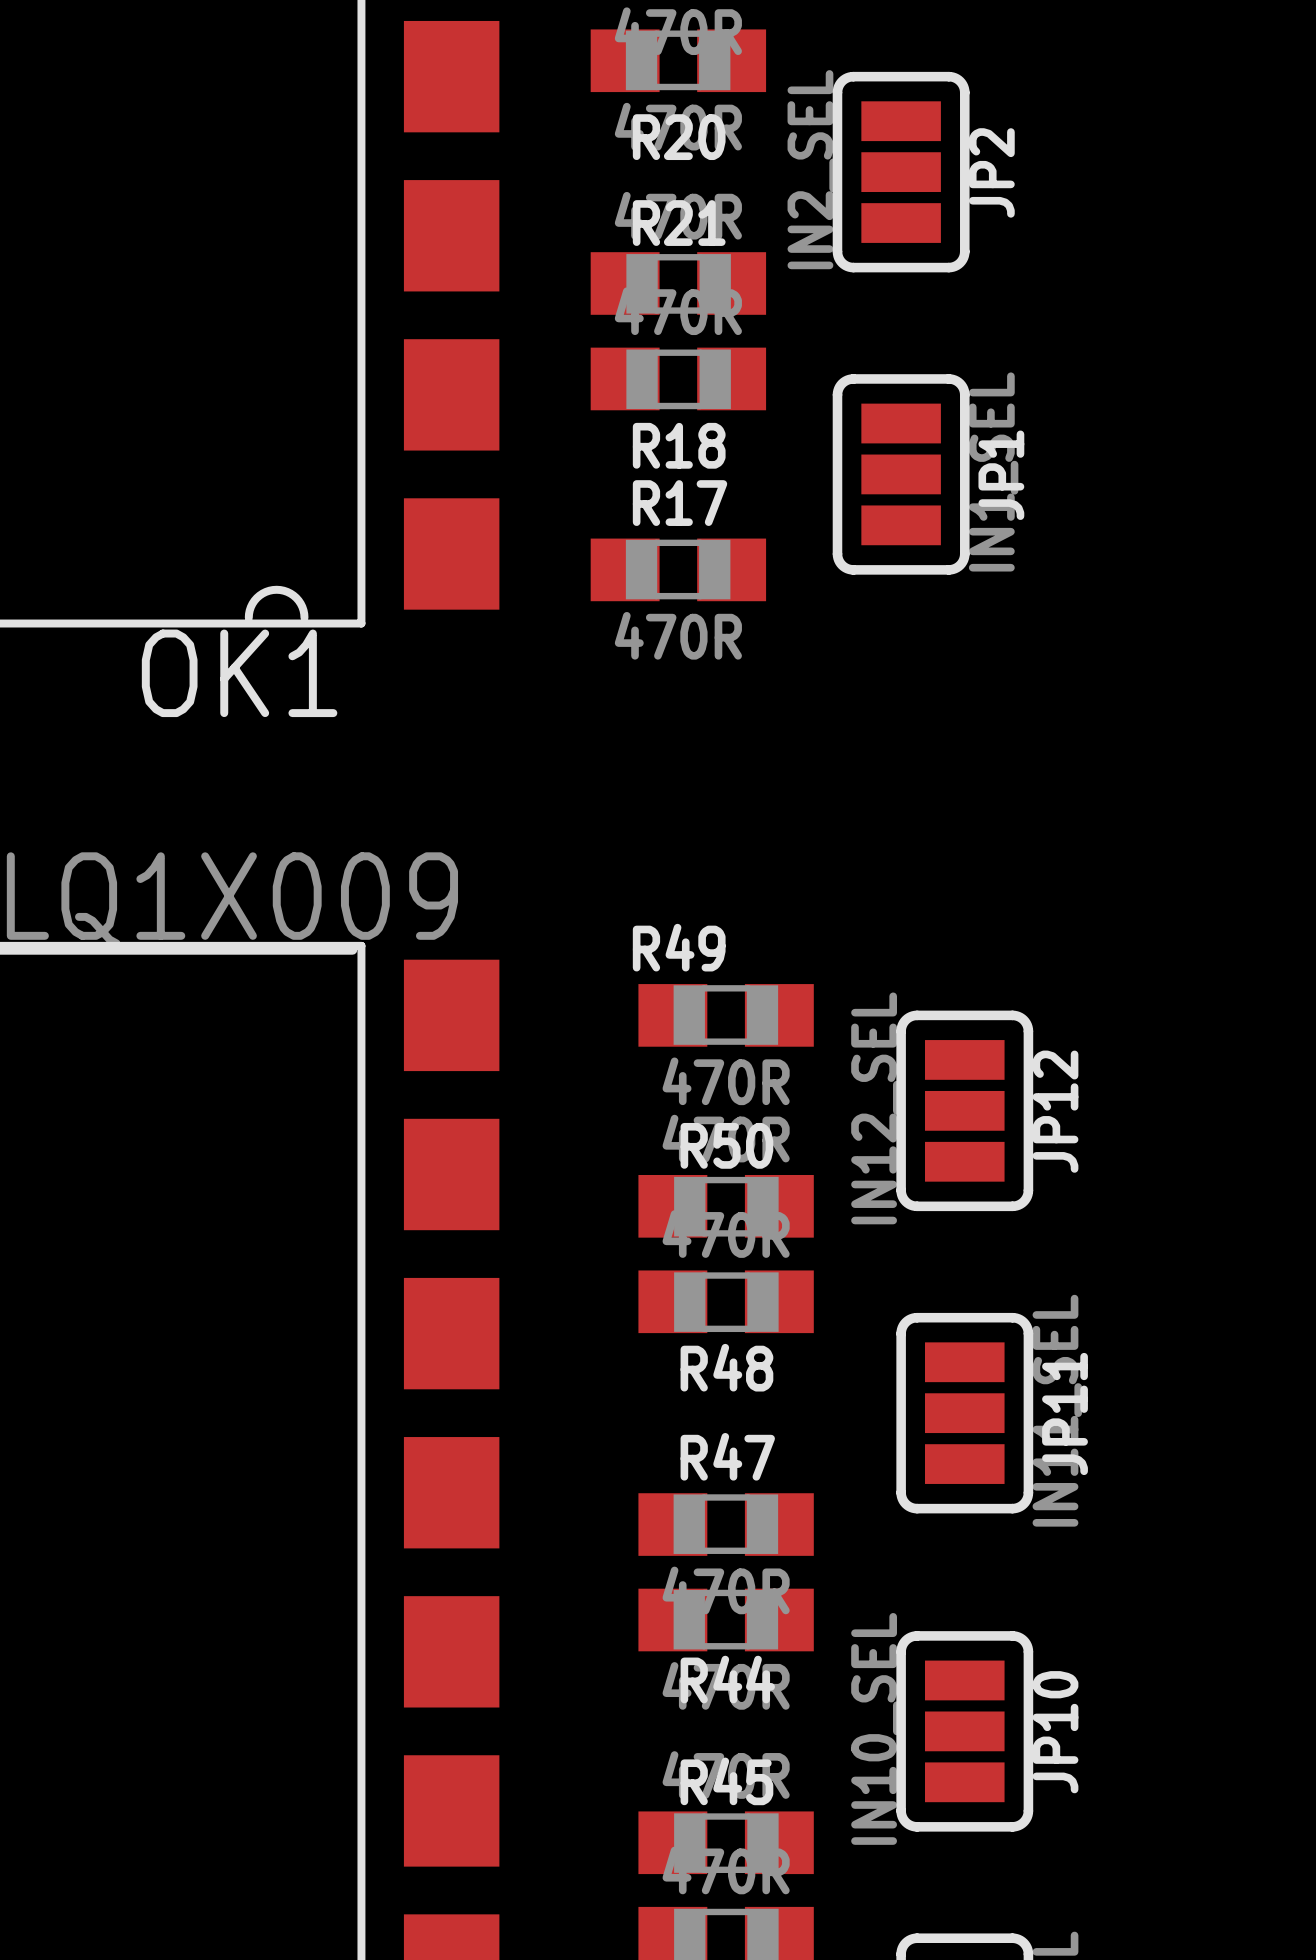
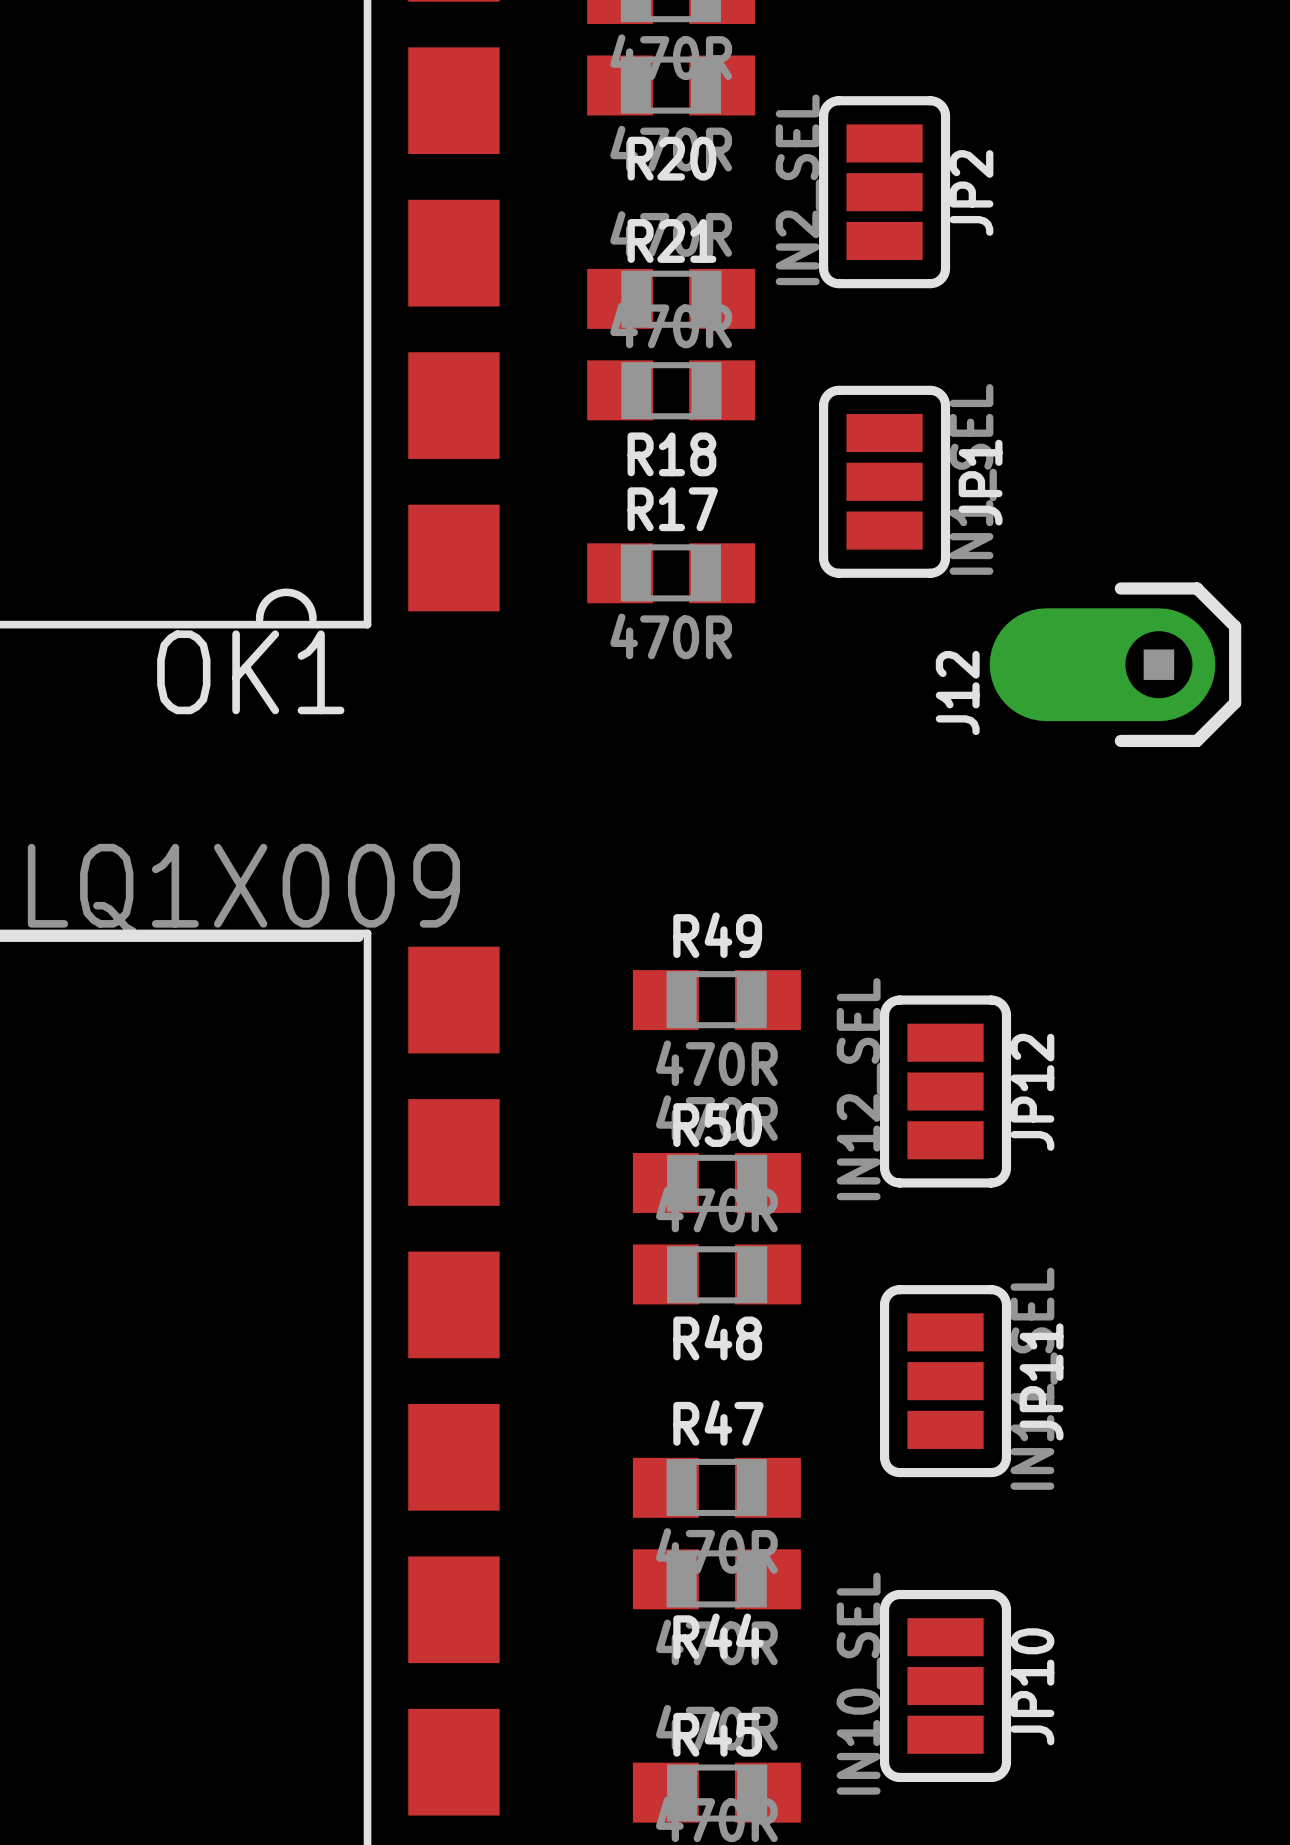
J12: none -> (1115, 664)
R49 name position: R49 (679, 947) -> R49 (717, 935)

